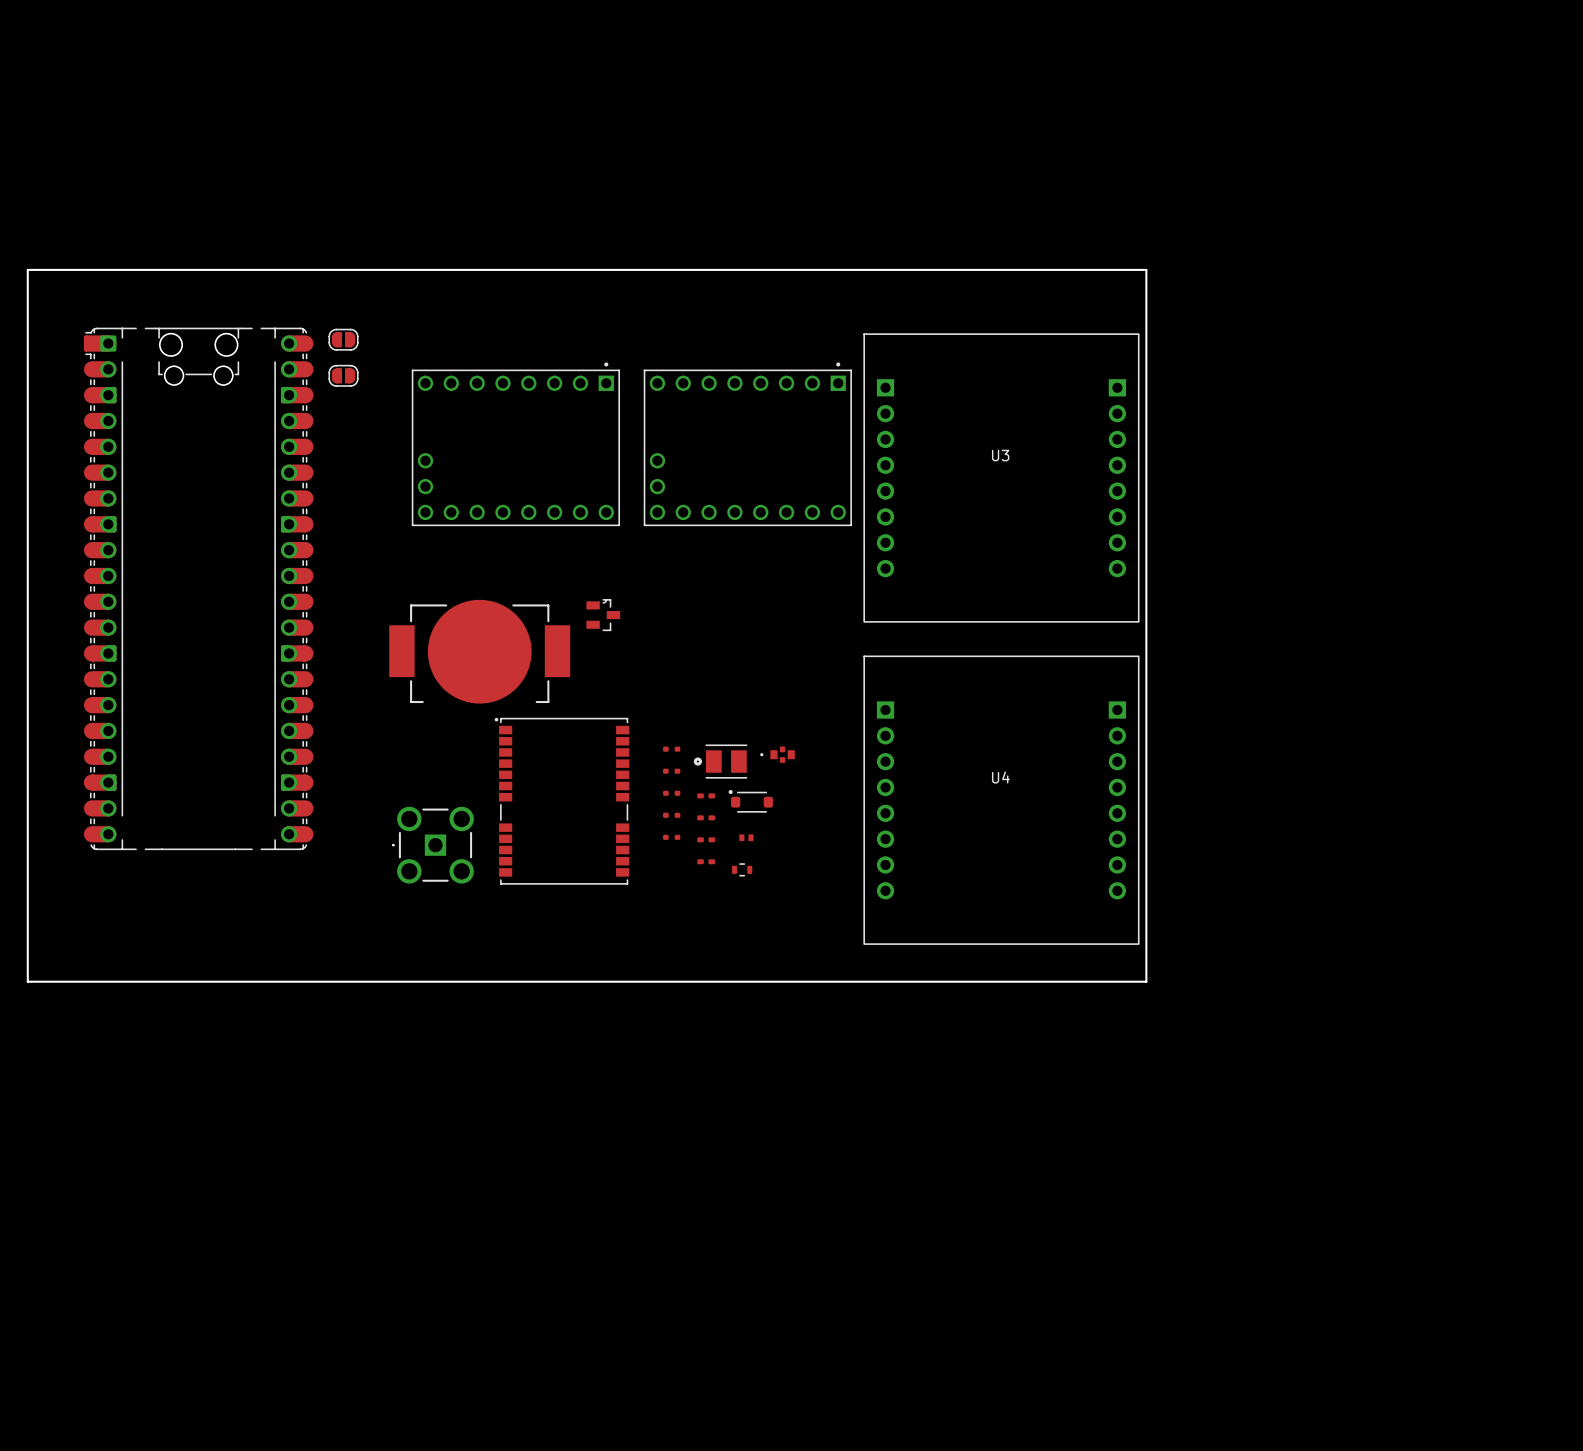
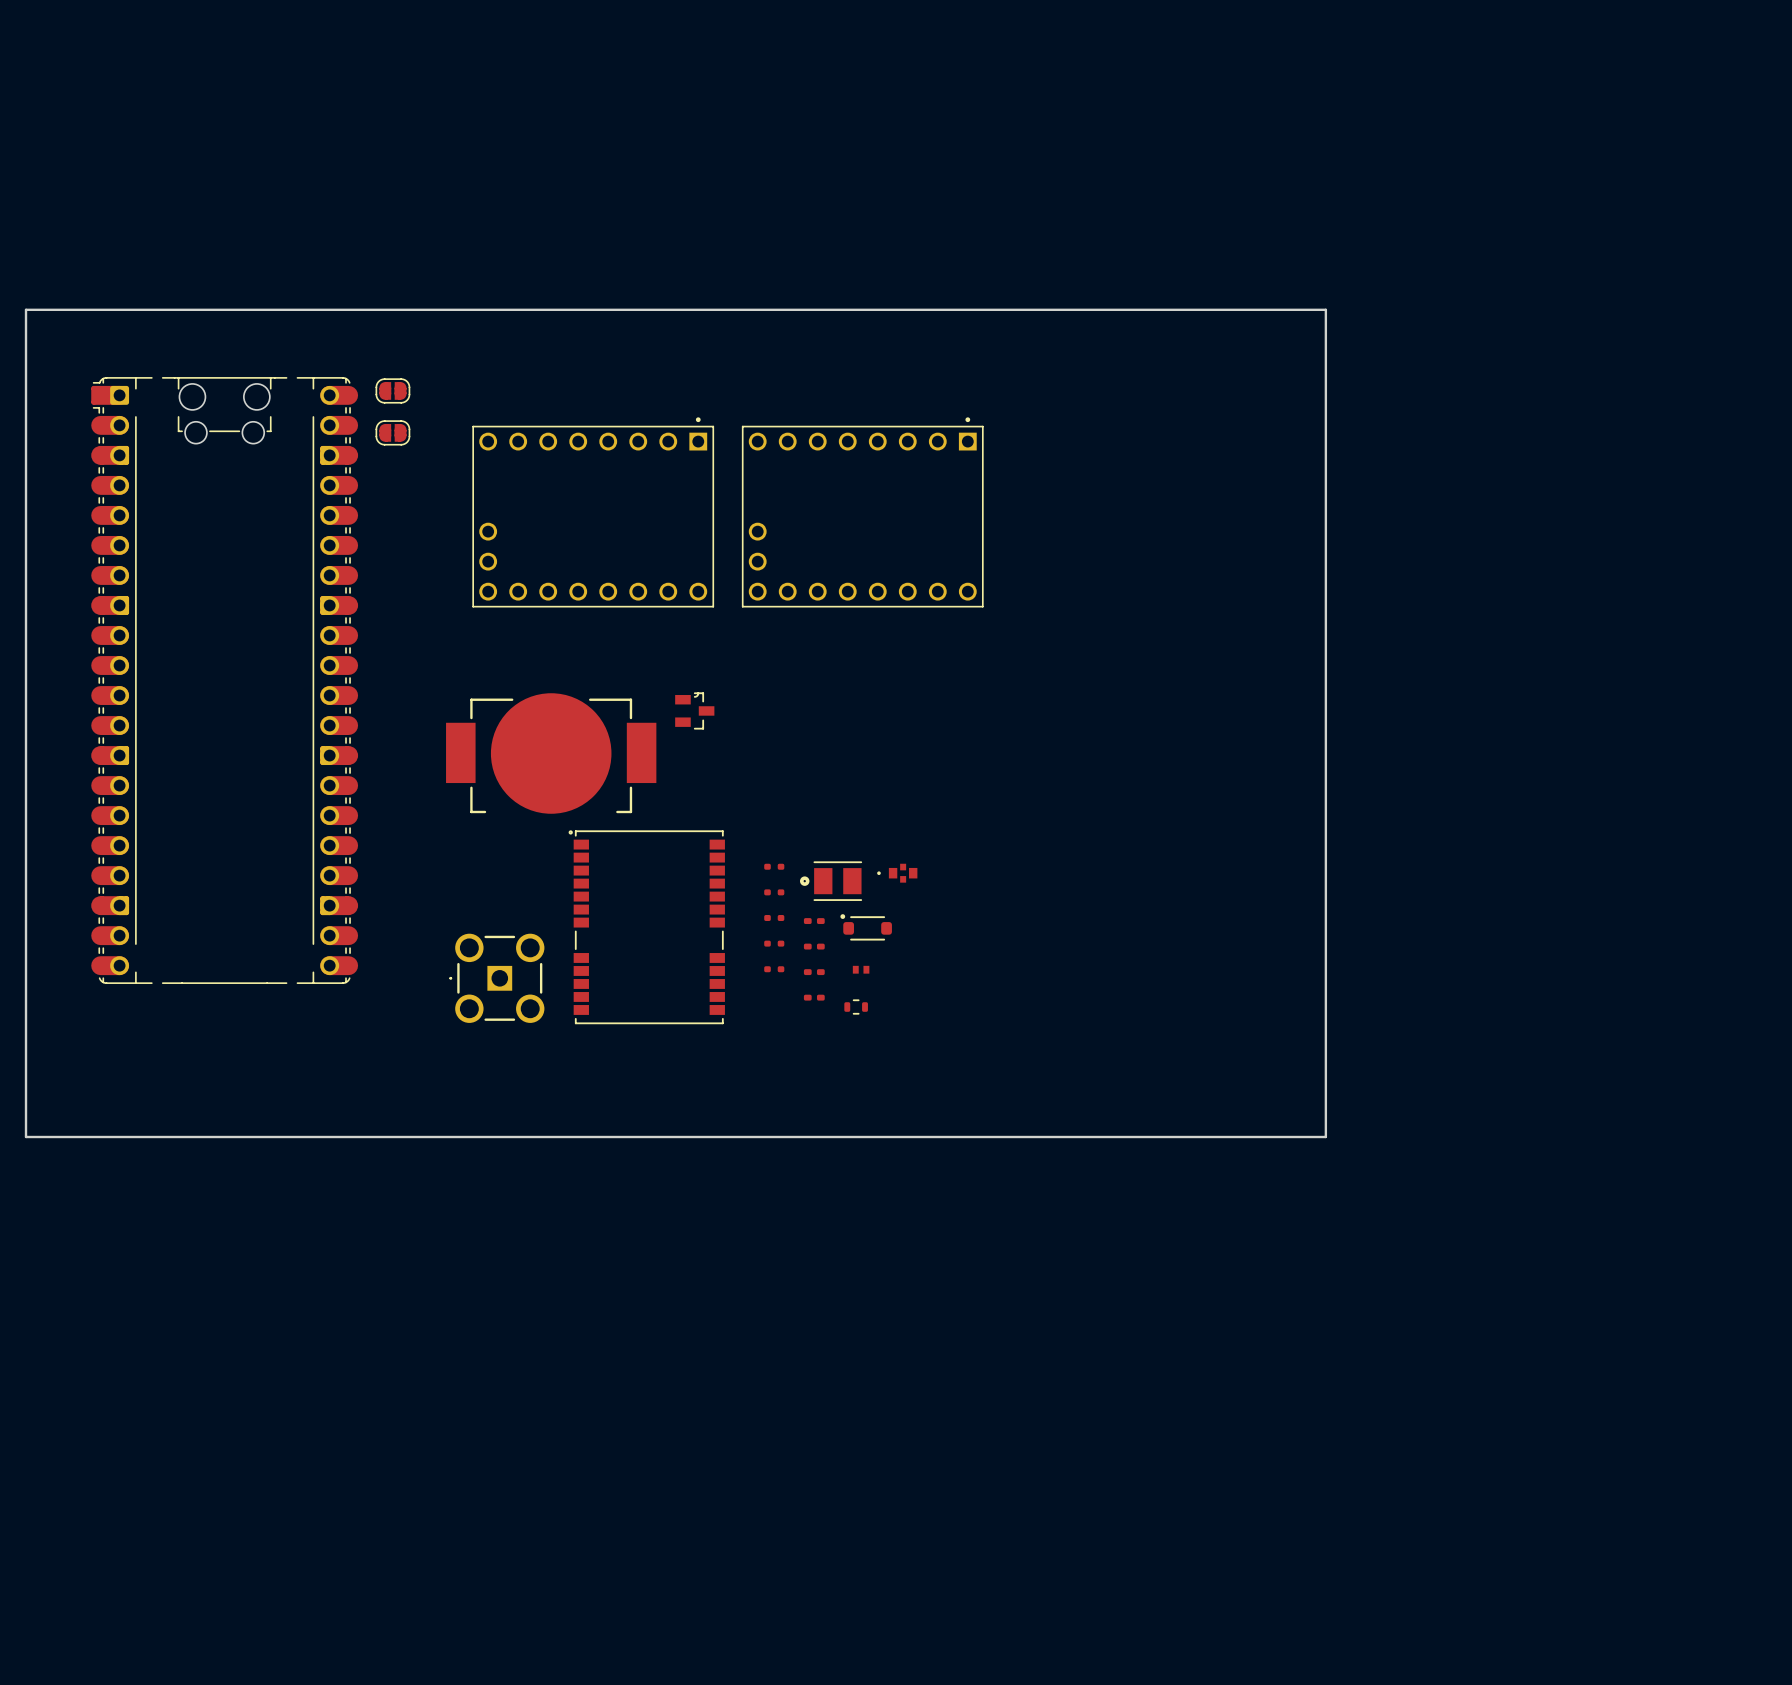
U3: (1001, 478) -> none
U4: (1001, 800) -> none

